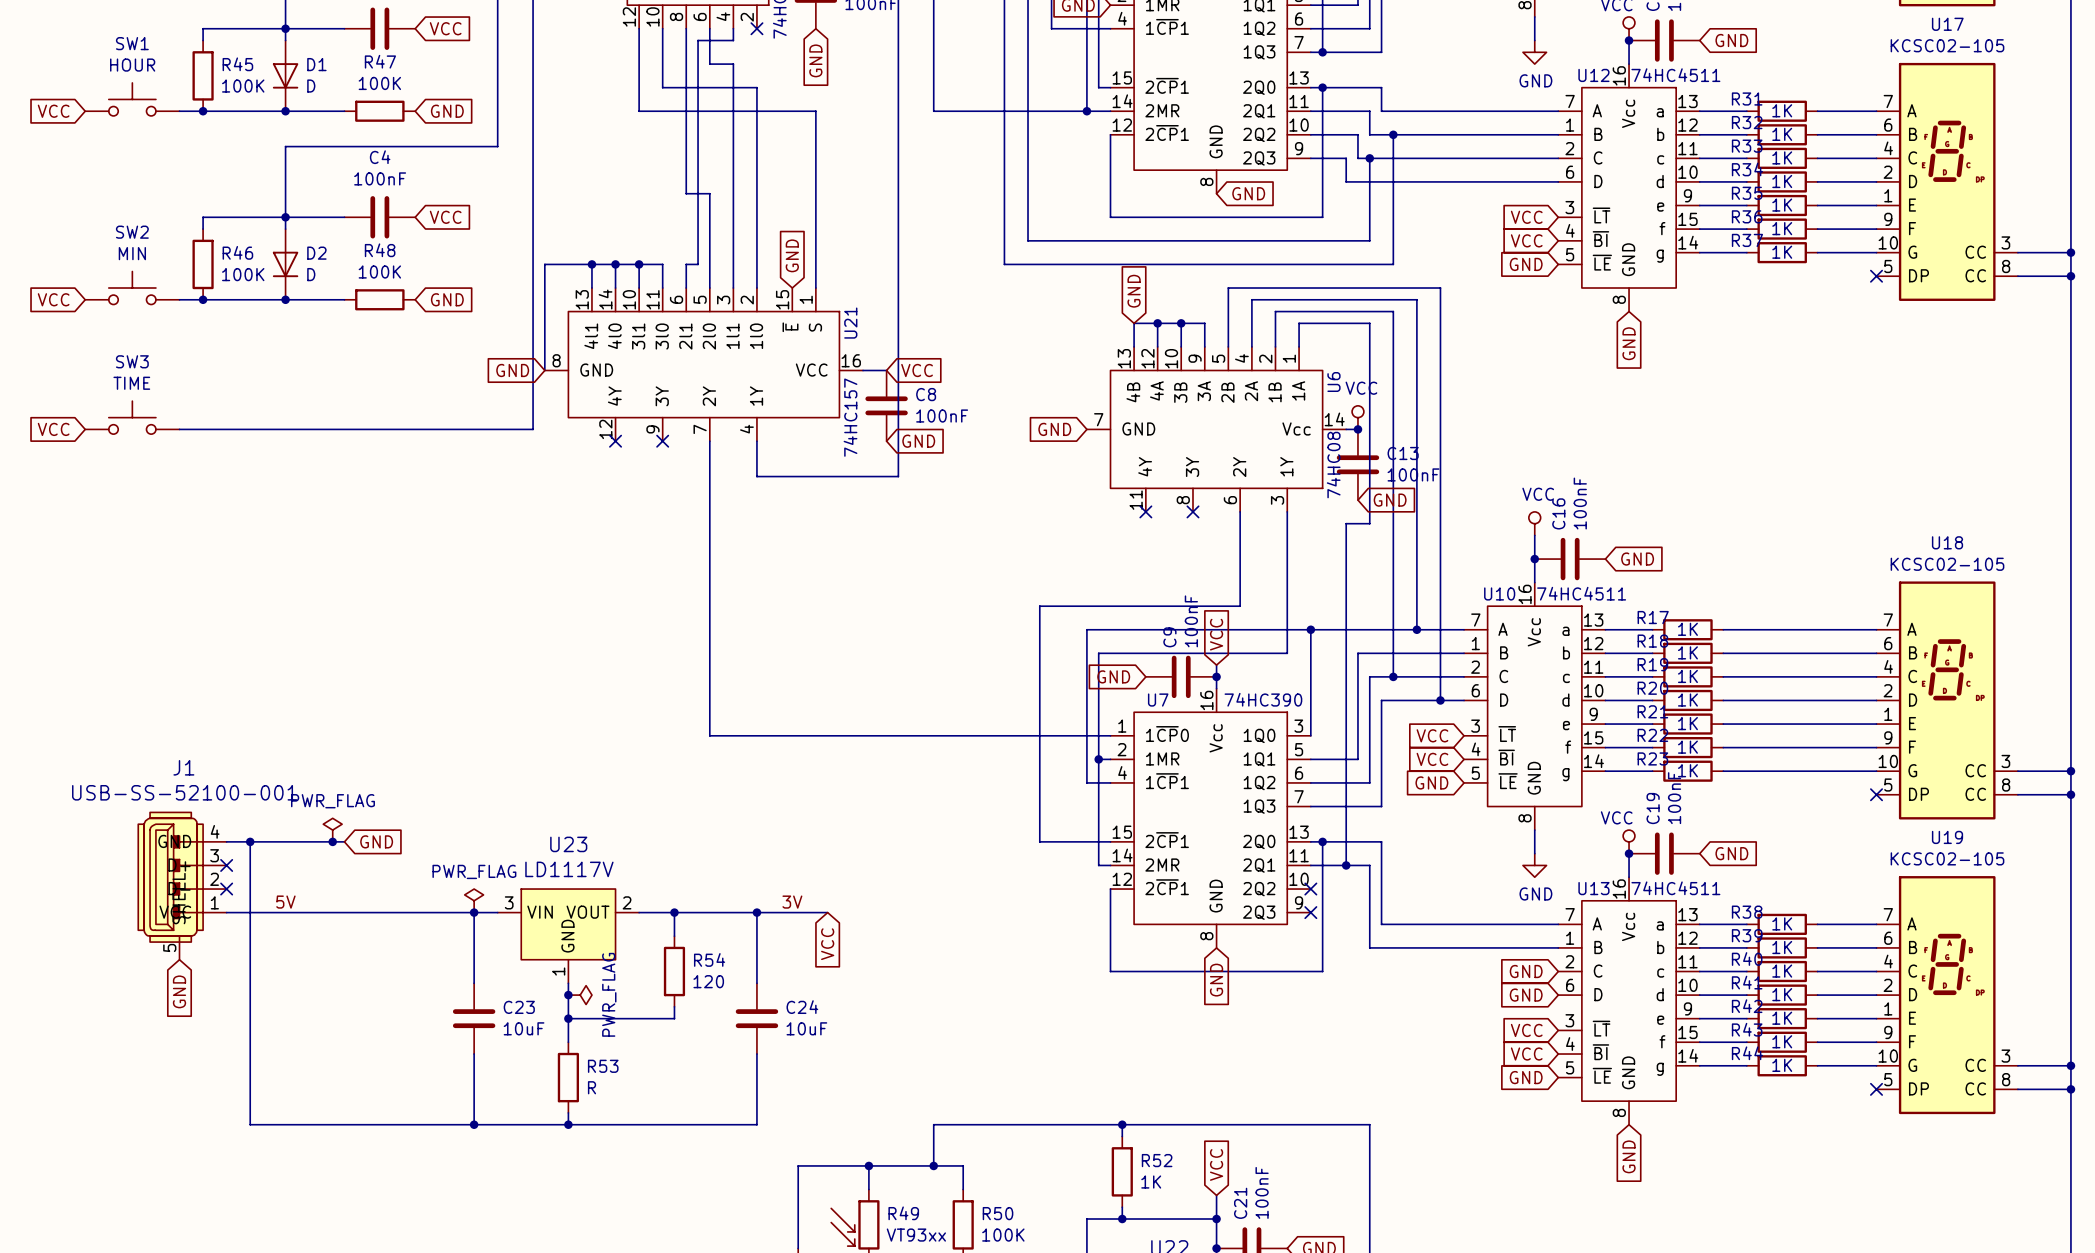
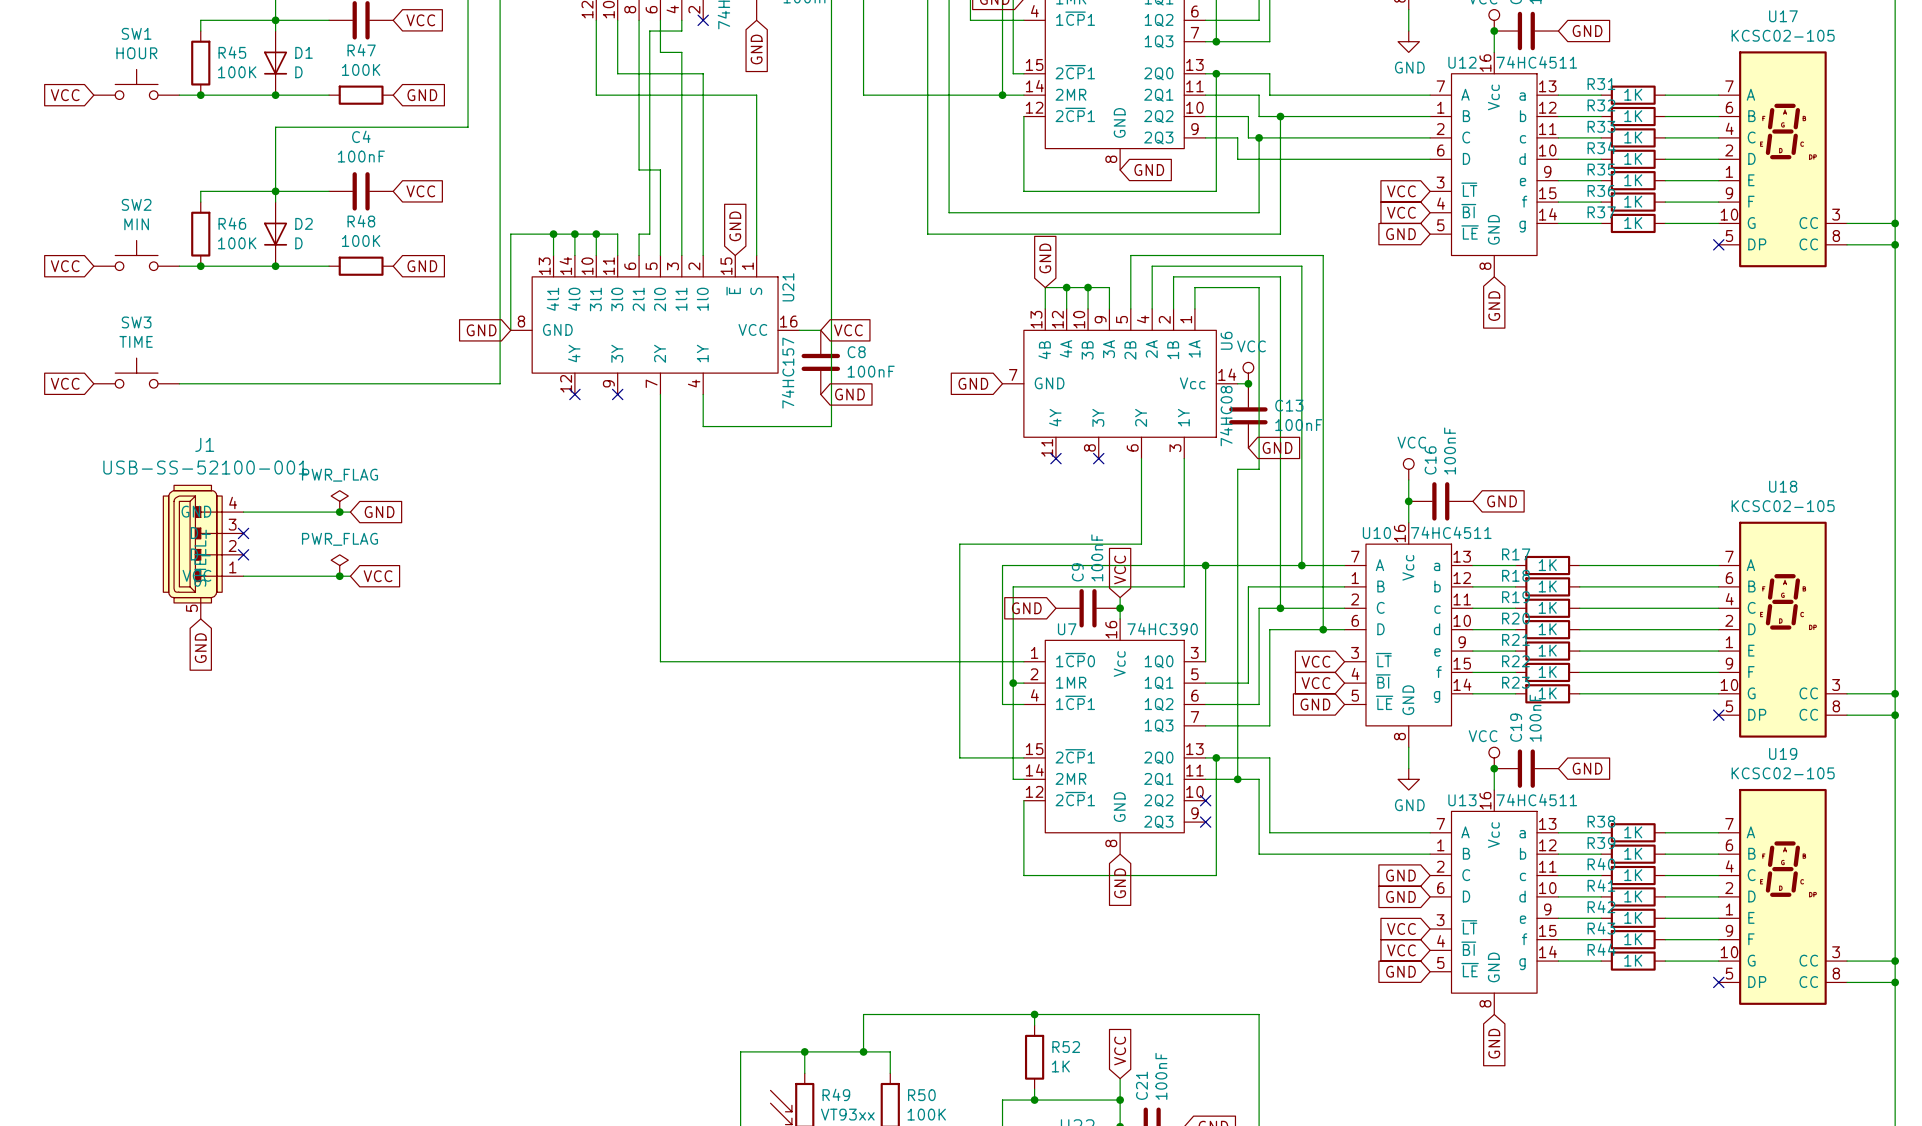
power symbol: none -> PWR_FLAG (339, 501)
wire: none -> (243, 512) (350, 512)
junction: none -> (339, 512)
global label: none -> GND (379, 512)
no-connect mark: none -> (243, 533)
no-connect mark: none -> (243, 554)
power symbol: none -> PWR_FLAG (339, 565)
junction: none -> (339, 576)
global label: none -> VCC (378, 576)
global label: none -> GND (200, 648)
power symbol: PWR_FLAG (332, 830) -> none
wire: (226, 841) (344, 841) -> (243, 576) (350, 576)
wire: (250, 841) (250, 1124) (756, 1124) (756, 1054) -> none
junction: (250, 841) -> none
junction: (332, 841) -> none
global label: GND (376, 841) -> none
no-connect mark: (226, 865) -> none
J1 position: (182, 886) -> (203, 552)
no-connect mark: (226, 889) -> none
power symbol: PWR_FLAG (474, 900) -> none
label: 5V (285, 902) -> none
label: 3V (792, 902) -> none
wire: (226, 912) (497, 912) -> none
wire: (474, 912) (474, 983) -> none
junction: (474, 912) -> none
wire: (639, 912) (827, 912) -> none
wire: (674, 912) (674, 936) -> none
junction: (674, 912) -> none
wire: (756, 912) (756, 983) -> none
junction: (756, 912) -> none
U23: LD1117V (568, 936) -> none
global label: VCC (827, 944) -> none
R54: 120 (674, 971) -> none
wire: (568, 983) (568, 1042) -> none
global label: GND (179, 991) -> none
junction: (568, 995) -> none
power symbol: PWR_FLAG (580, 995) -> none
wire: (674, 1006) (674, 1018) (568, 1018) -> none
C23: 10uF (474, 1018) -> none
junction: (568, 1018) -> none
C24: 10uF (756, 1018) -> none
wire: (474, 1054) (474, 1124) -> none
R53: R (568, 1077) -> none
wire: (568, 1112) (568, 1124) -> none
junction: (474, 1124) -> none
junction: (568, 1124) -> none

